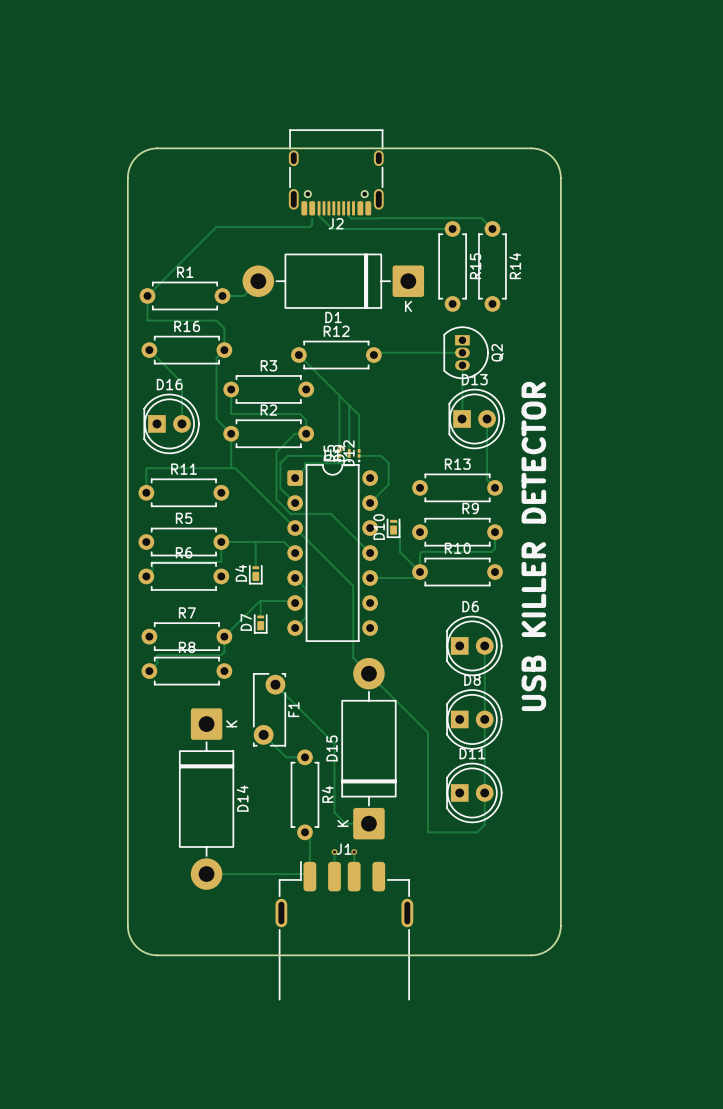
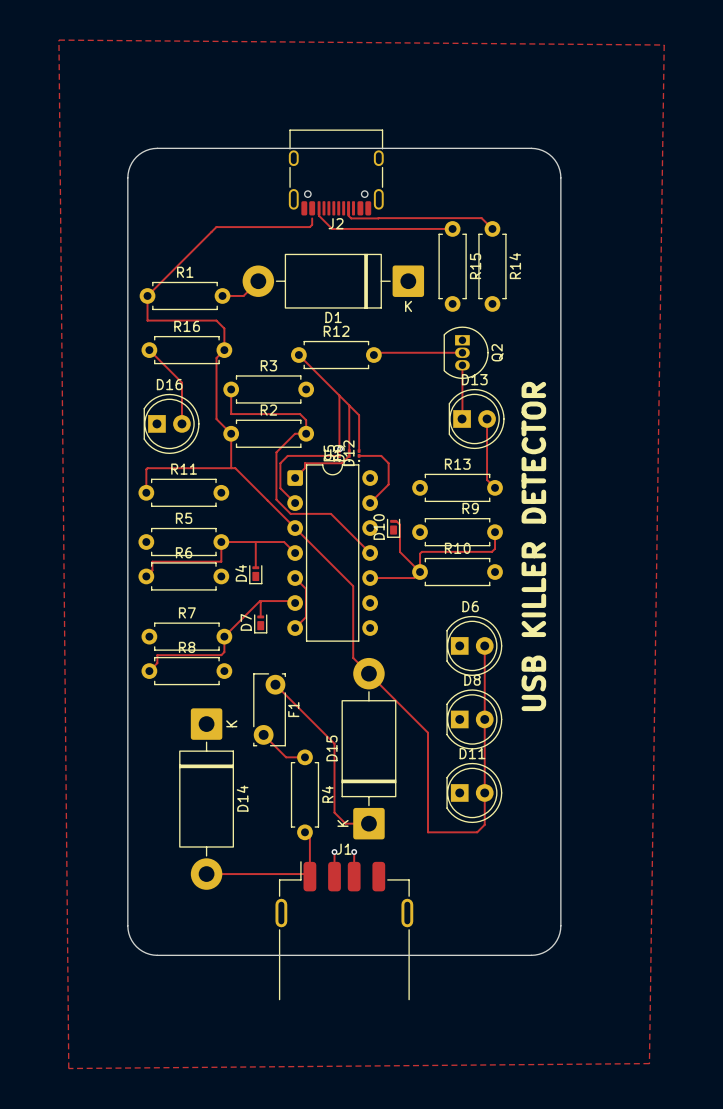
zone outline: none -> (58, 40) (664, 45) (649, 1063) (68, 1068) (58, 40)

